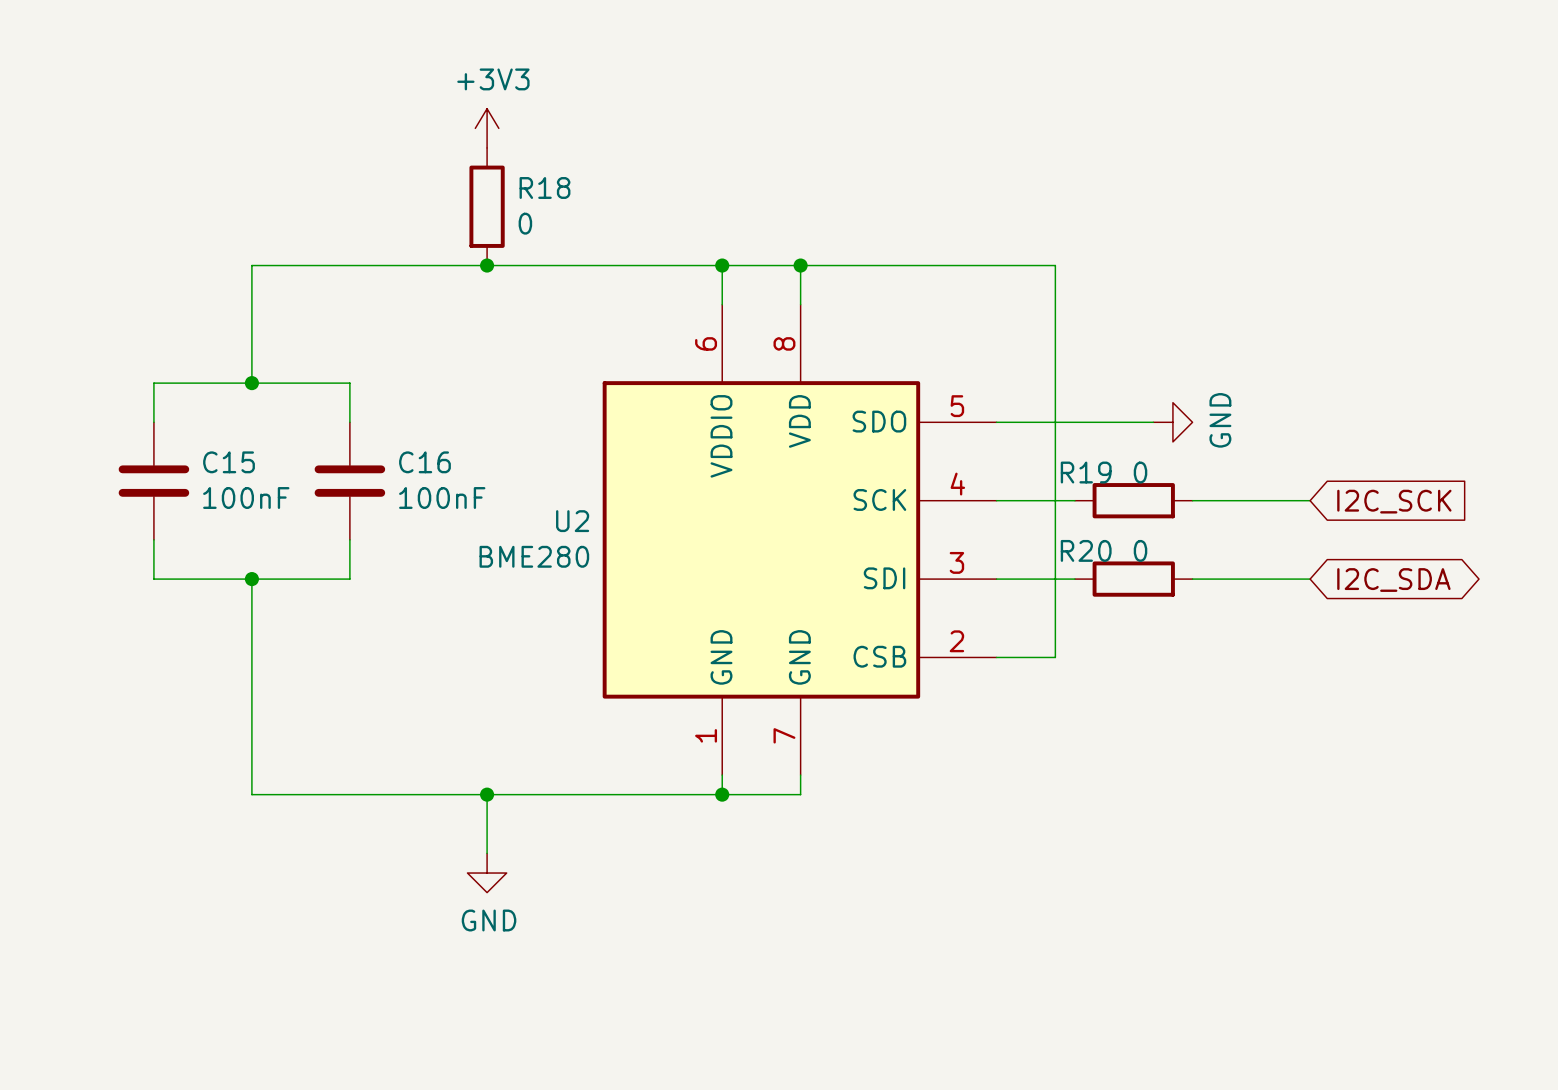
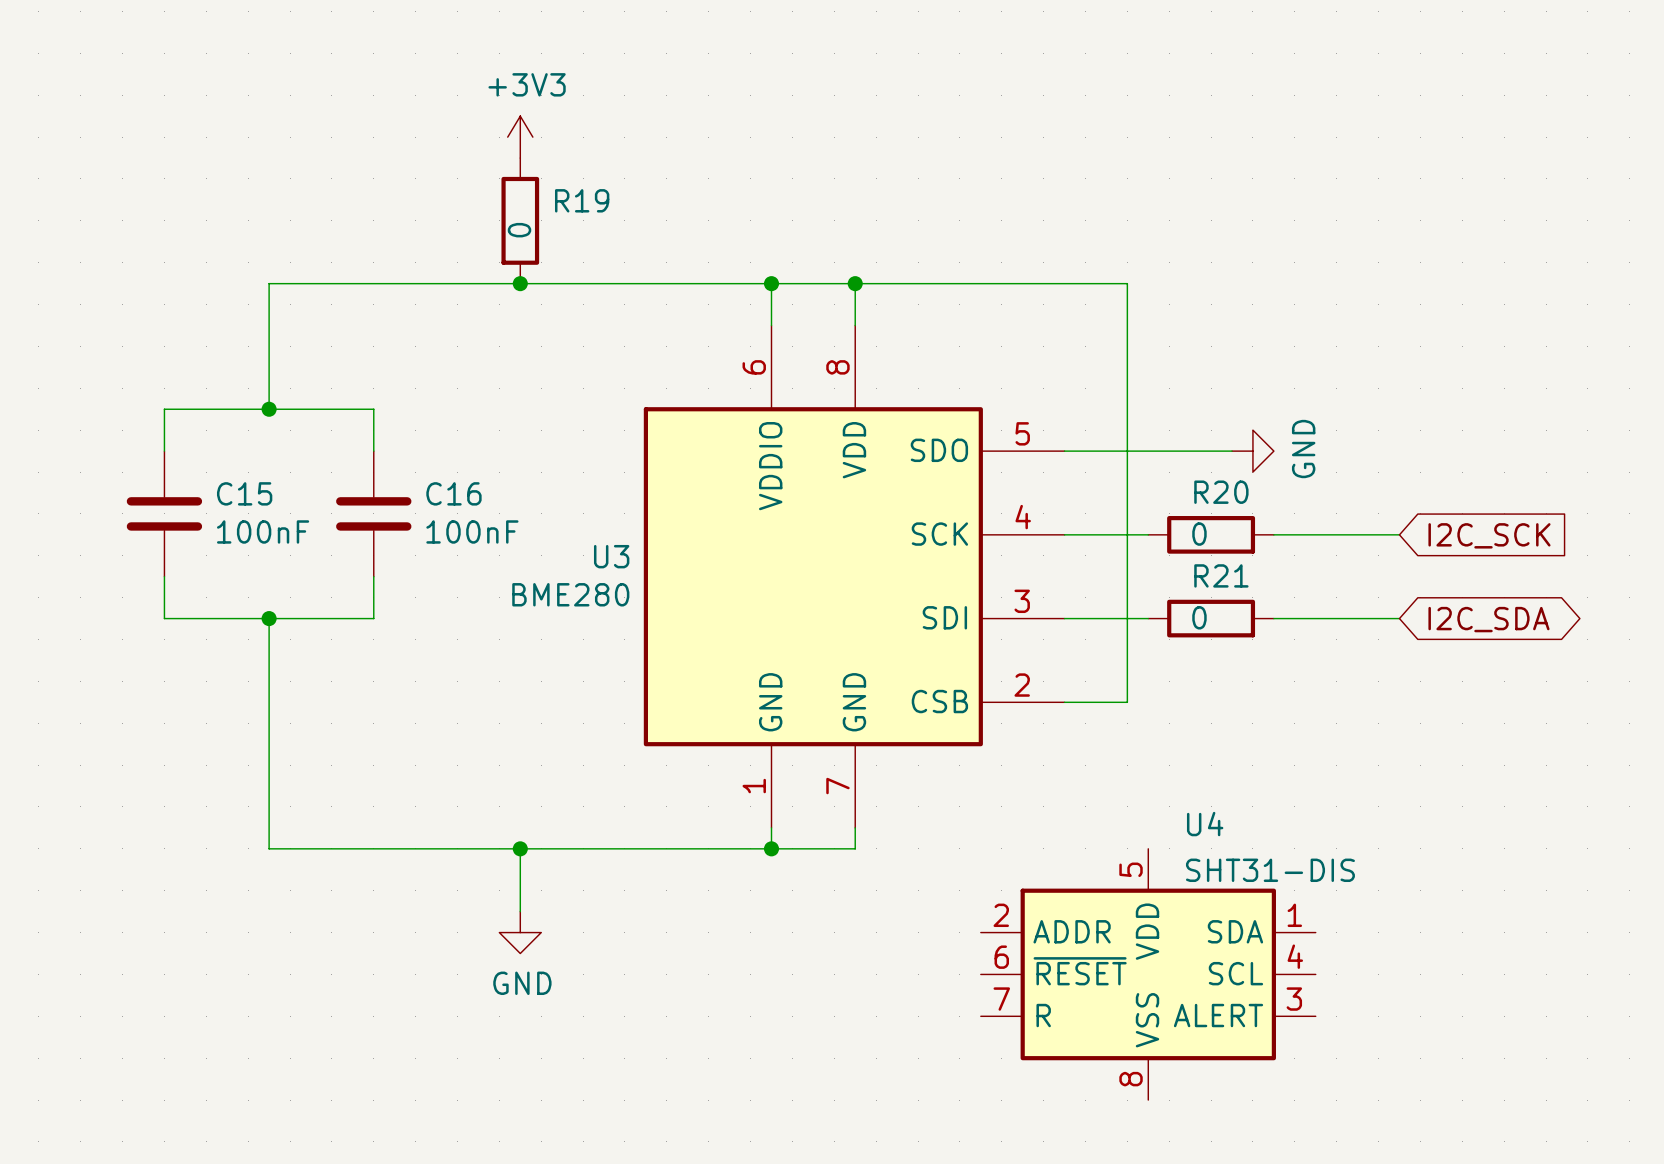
R18 name: R18 (544, 187) -> R19 (582, 200)
R18 value rotation: 0° (525, 223) -> 90° counterclockwise (519, 230)
R18 value position: 0 (525, 223) -> 0 (519, 230)
R19 name: R19 (1086, 472) -> R20 (1221, 492)
R19 value position: 0 (1140, 472) -> 0 (1199, 534)
U2 name: U2 (572, 521) -> U3 (611, 556)
R20 name: R20 (1086, 550) -> R21 (1221, 575)
R20 value position: 0 (1140, 550) -> 0 (1199, 617)
U4: none -> SHT31-DIS (1148, 974)

